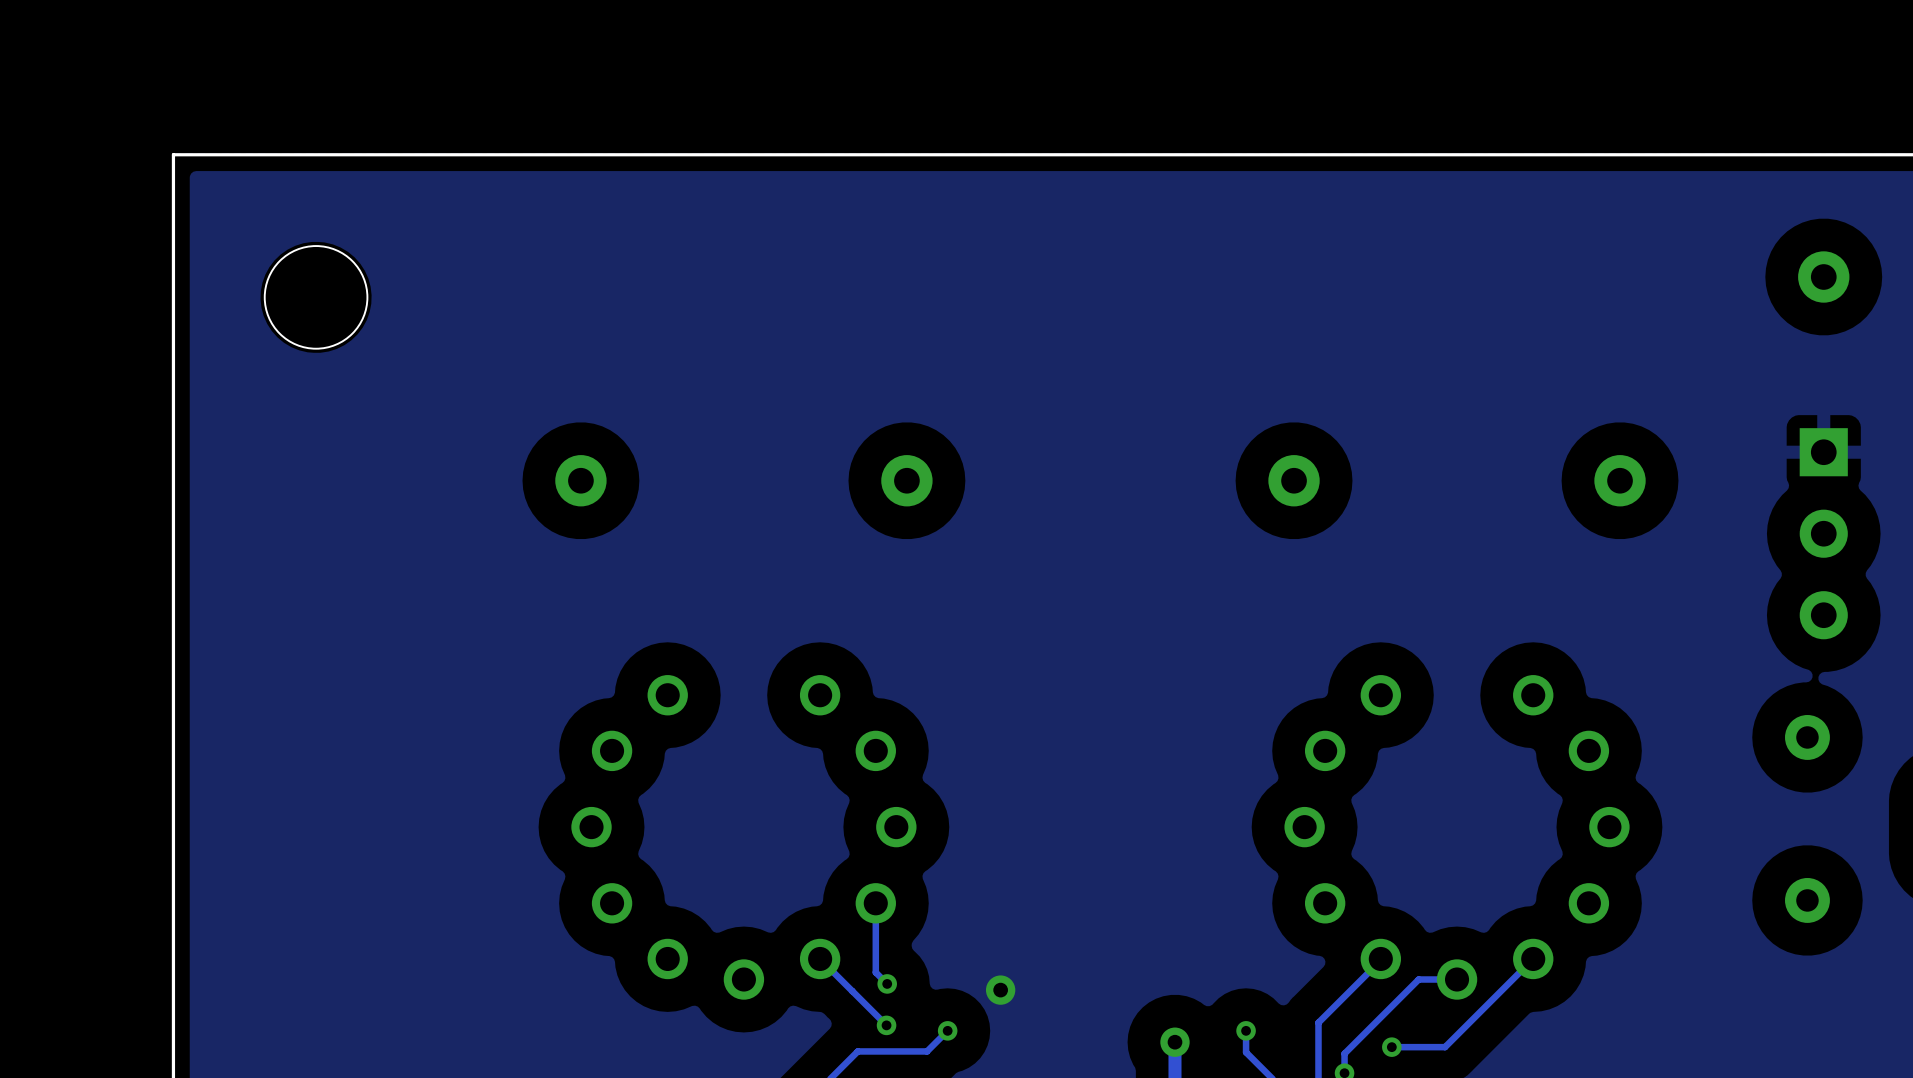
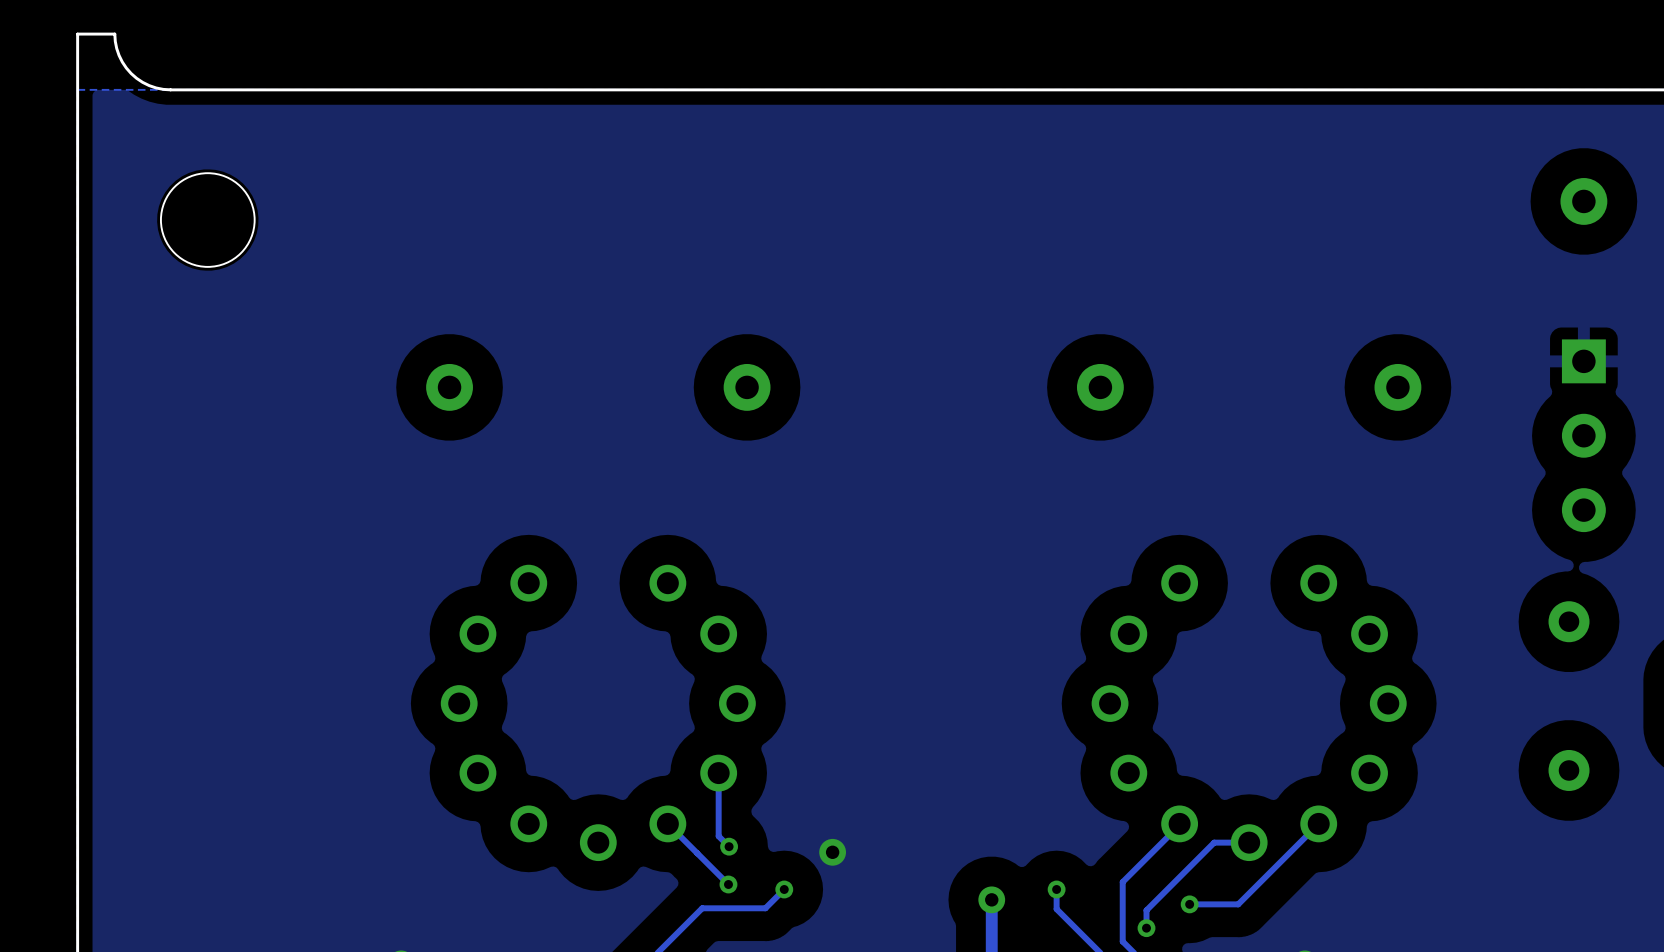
board edge: (275, 154) (173, 154) -> (170, 89) (149, 85) (131, 73) (119, 55) (114, 34) (77, 34) (77, 89)

